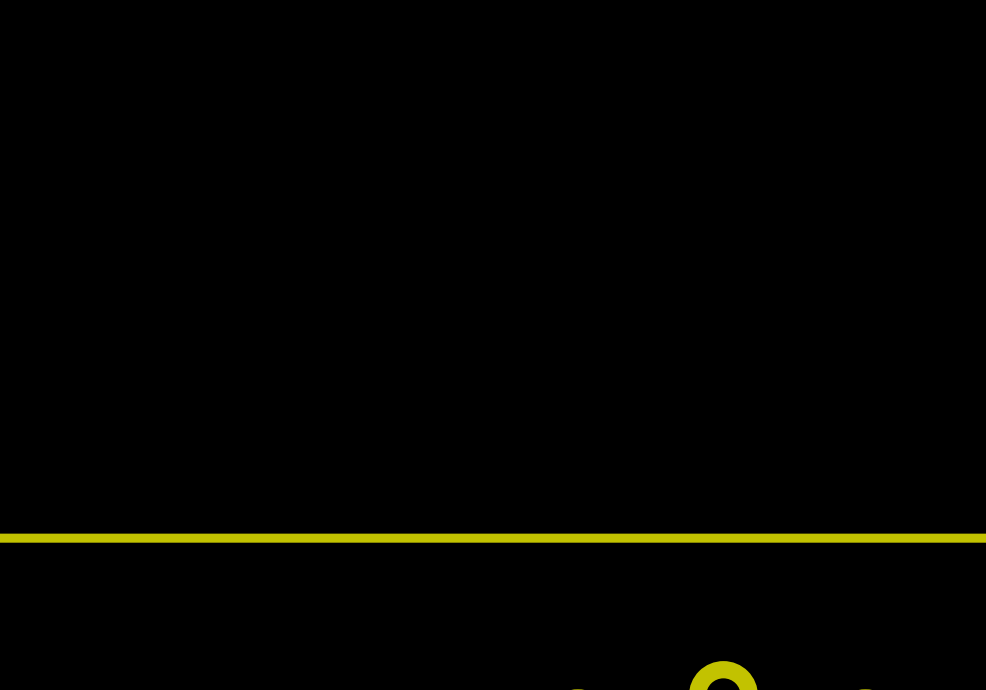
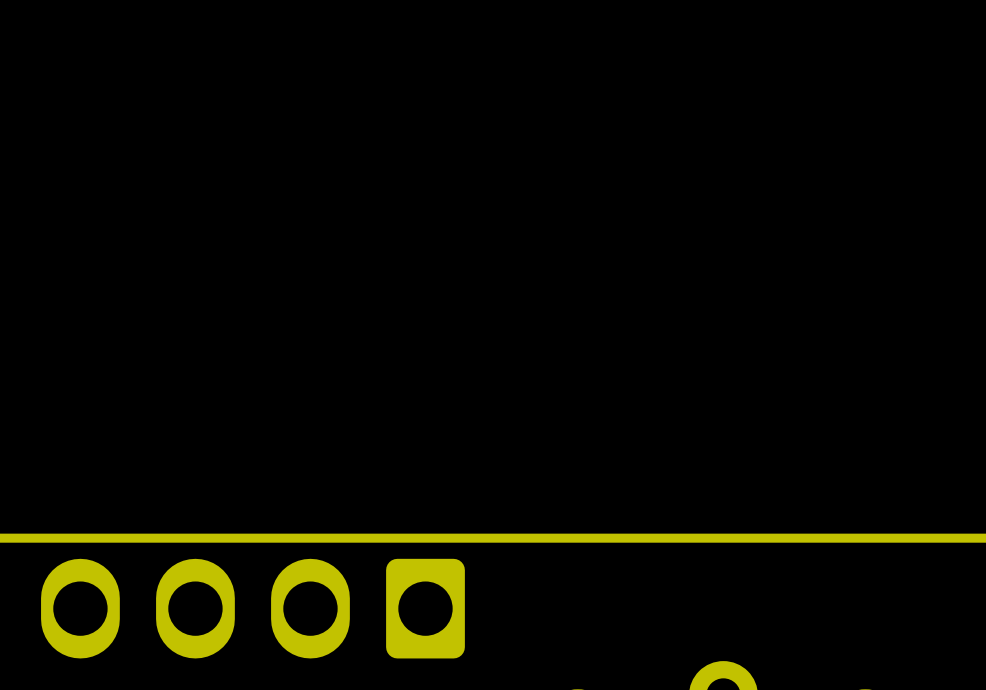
part: none -> (252, 608)

